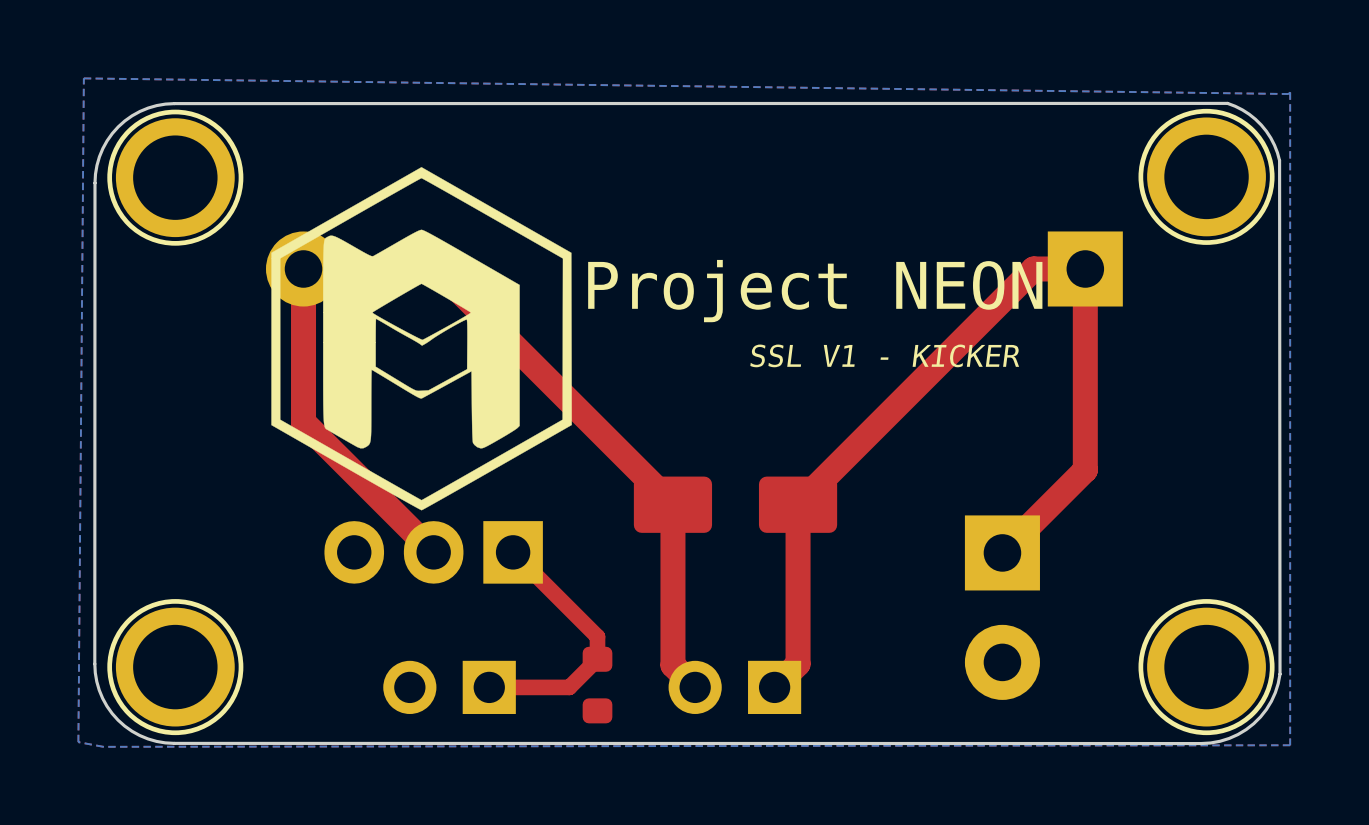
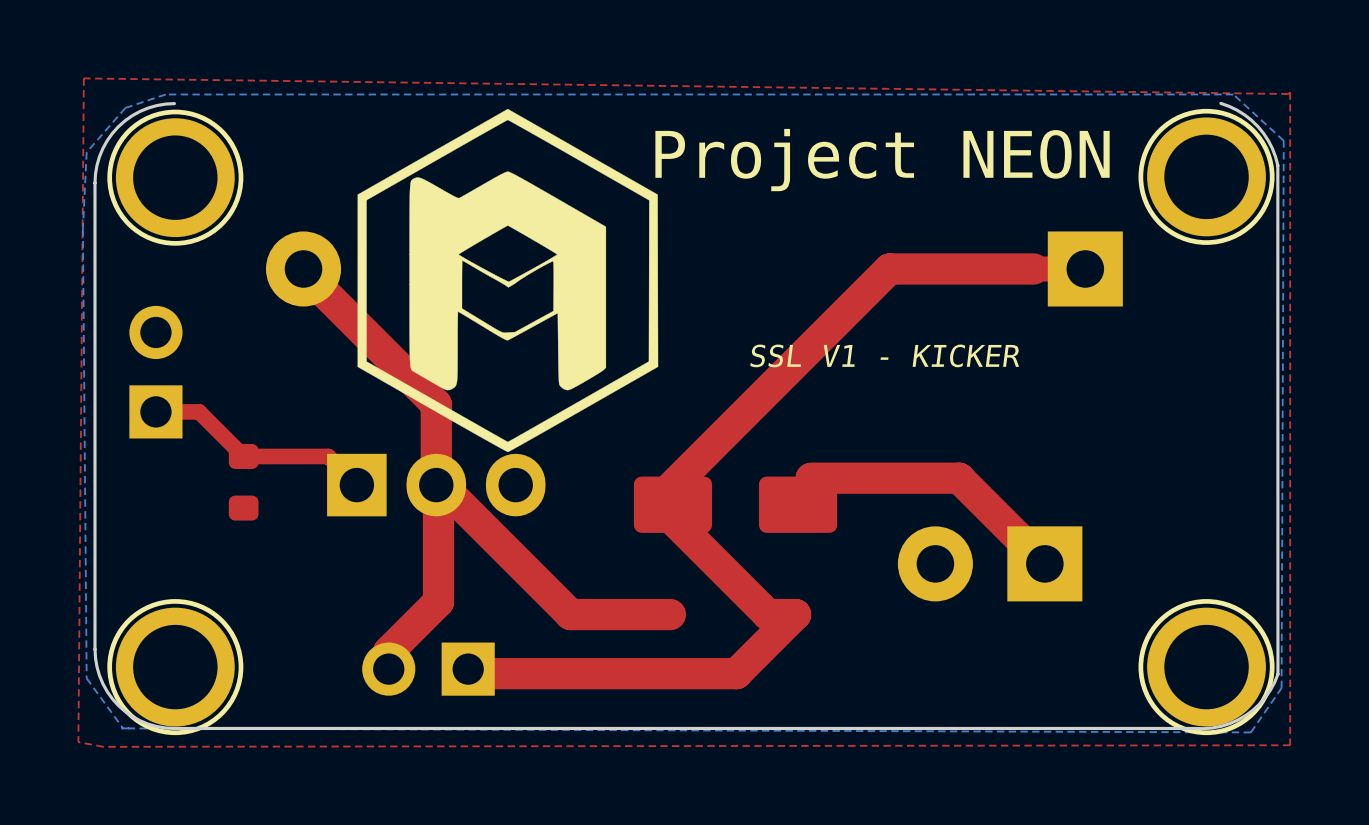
bottom zone outline: (83, 78) (78, 742) (103, 746) (1290, 745) (1290, 92) (1288, 94) (83, 78) -> none
board edge: (174, 103) (1227, 103) (1242, 109) (1255, 119) (1266, 131) (1274, 145) (1279, 160) (1280, 674) (1271, 701) (1260, 716) (1237, 734) (1220, 741) (1201, 743) (174, 743) (156, 741) (139, 735) (124, 726) (112, 713) (102, 698) (95, 672) (94, 183) -> (1220, 103) (1237, 110) (1257, 126) (1268, 140) (1277, 165) (1277, 674) (1265, 697) (1245, 715) (1221, 726) (1203, 728) (174, 728) (156, 726) (139, 720) (124, 711) (107, 691) (99, 675) (95, 658) (94, 183)
top track: none -> (299, 268) (436, 404) (436, 485)
top track: (1033, 268) (798, 504) (798, 663) (774, 687) -> (1033, 268) (889, 268) (651, 506) (651, 515) (668, 515) (767, 614) (795, 614) (736, 673) (472, 673) (468, 669)
top track: (1080, 268) (1085, 268) (1085, 470) (1002, 552) -> none
text position: Project NEON (815, 291) -> Project NEON (882, 160)
drawing position: (421, 338) -> (507, 280)
top track: none -> (155, 411) (199, 411) (243, 456) (328, 456) (356, 485)
top track: none -> (810, 478) (959, 478) (1044, 563)
top track: none -> (436, 485) (441, 485) (570, 614) (670, 614)
top track: none -> (436, 485) (438, 487) (438, 601) (388, 651) (388, 669)
top track: (433, 552) (303, 422) (303, 268) (437, 268) (672, 504) (672, 665) (695, 687) -> none
part rotation: 0° (433, 552) -> 180° (436, 485)
top track: (513, 552) (597, 636) (597, 659) (569, 687) (489, 687) -> none
part rotation: 0° (1002, 607) -> 90° clockwise (990, 563)
part position: (597, 685) -> (243, 482)
part position: (449, 687) -> (428, 669)
part rotation: 0° (734, 687) -> 90° clockwise (155, 372)
part position: (734, 687) -> (155, 372)
bottom zone outline: none -> (122, 727) (86, 678) (82, 229) (86, 152) (125, 107) (165, 94) (1233, 94) (1283, 140) (1281, 688) (1250, 732) (121, 728) (129, 728)

